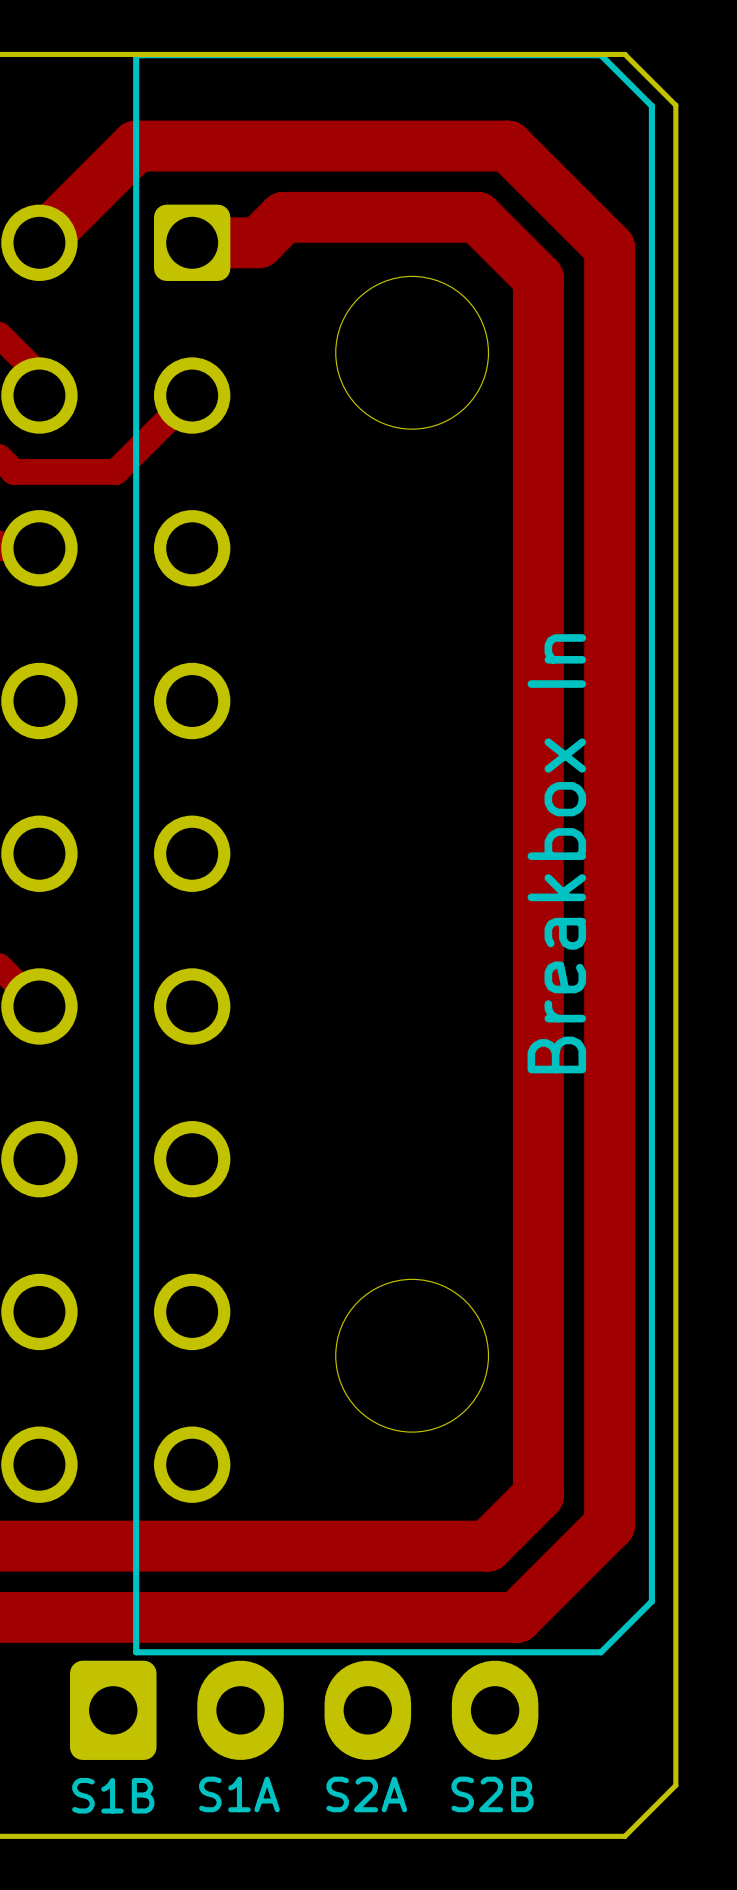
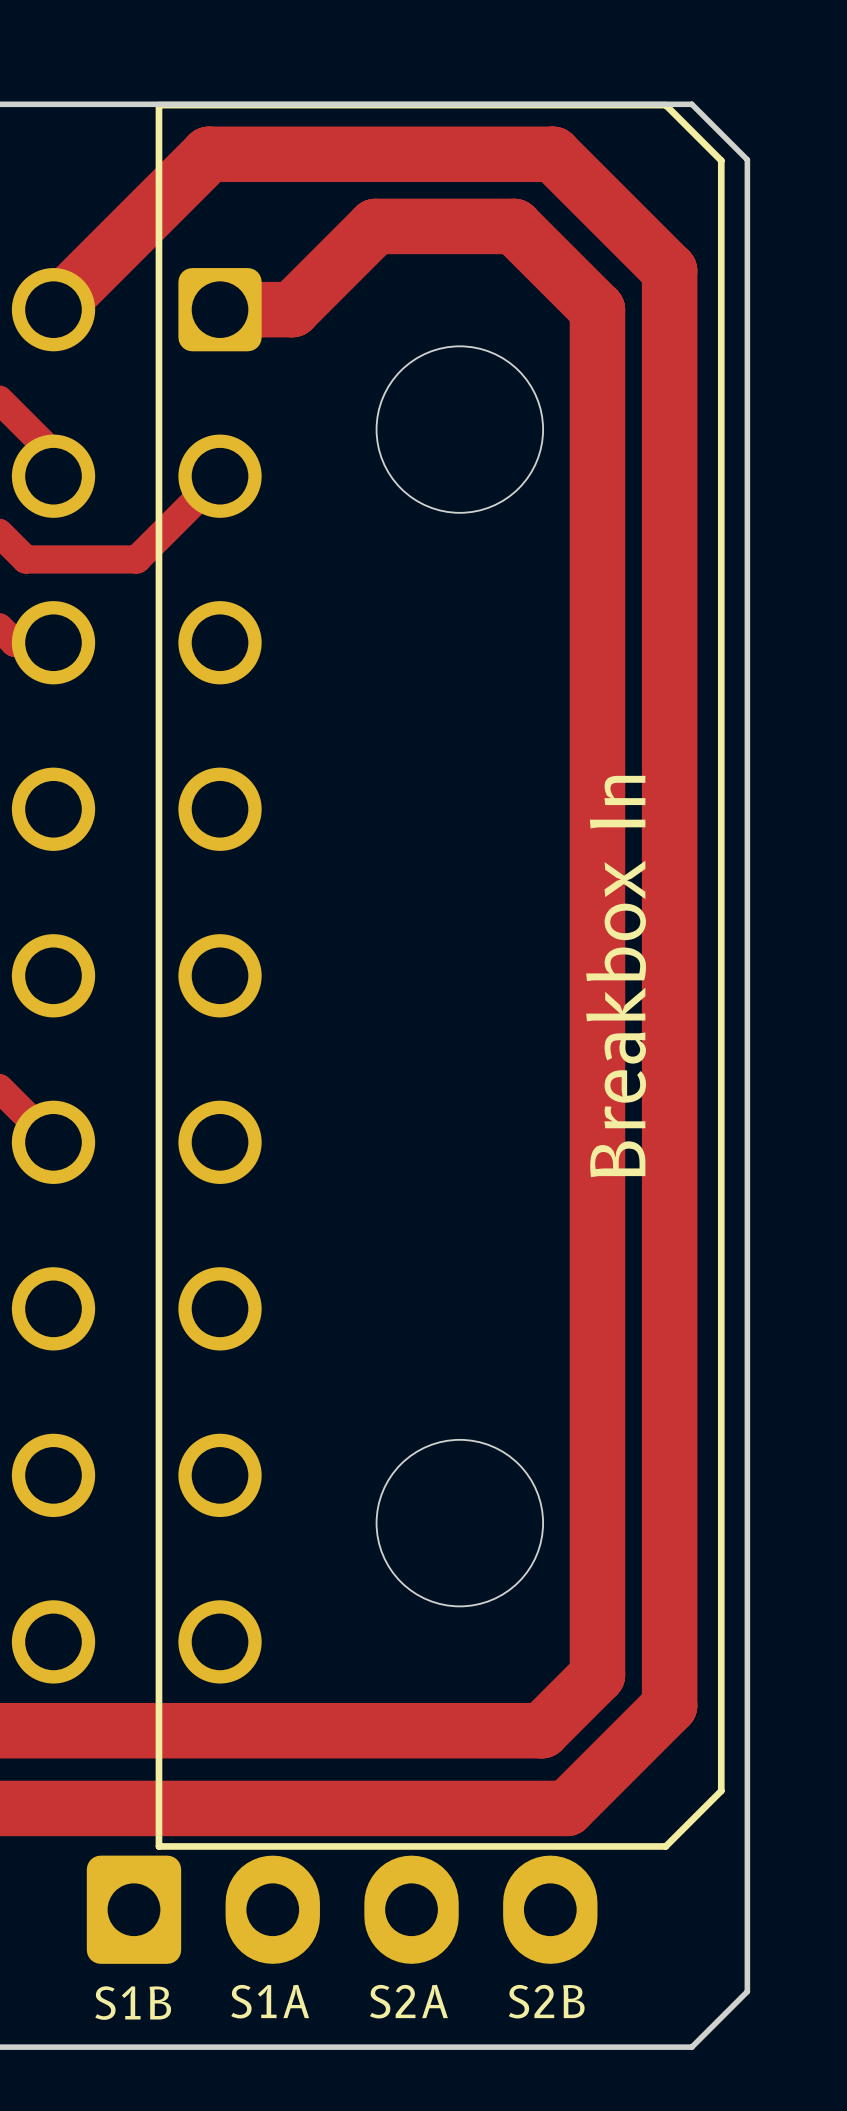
track: (136, 146) (507, 146) (609, 247) (609, 1524) (516, 1617) (510, 1617) -> (158, 204) (208, 154) (553, 154) (669, 270) (669, 1705) (566, 1808)
track: (283, 217) (477, 217) (538, 278) -> (319, 281) (375, 226) (514, 226) (597, 309) (597, 348)

